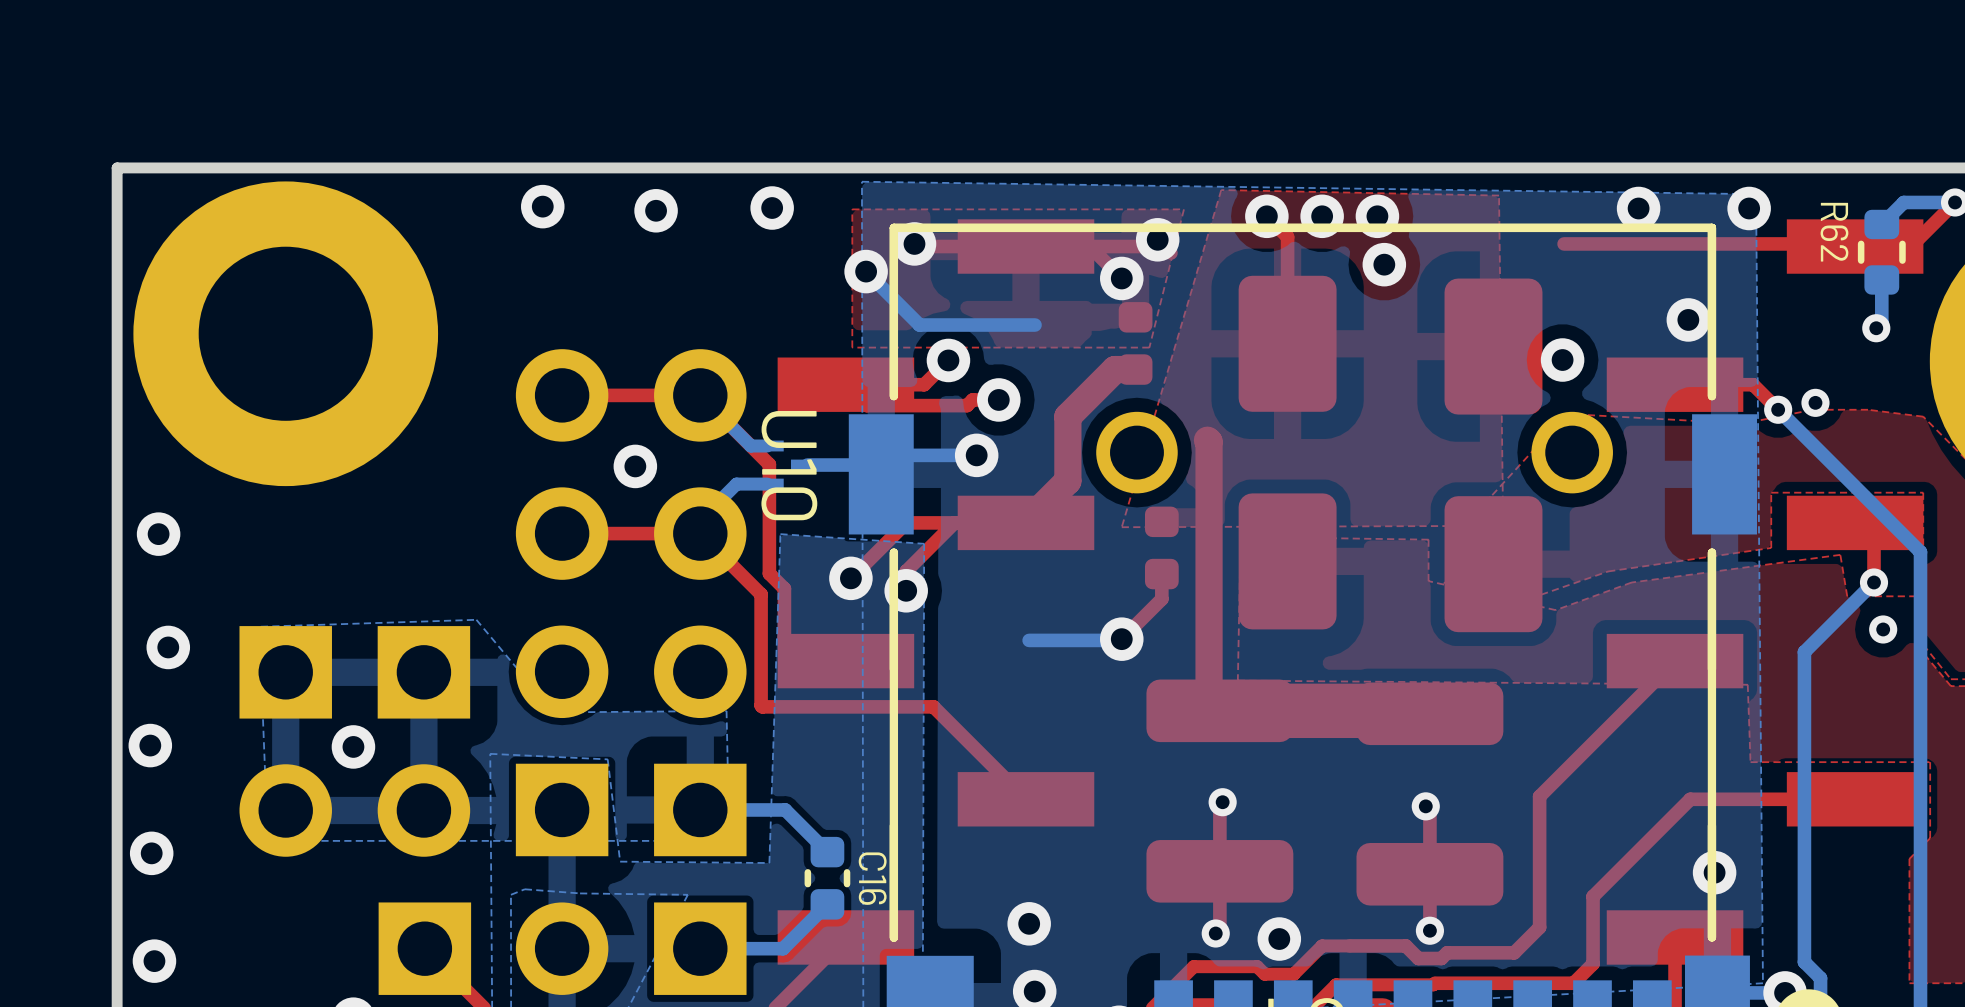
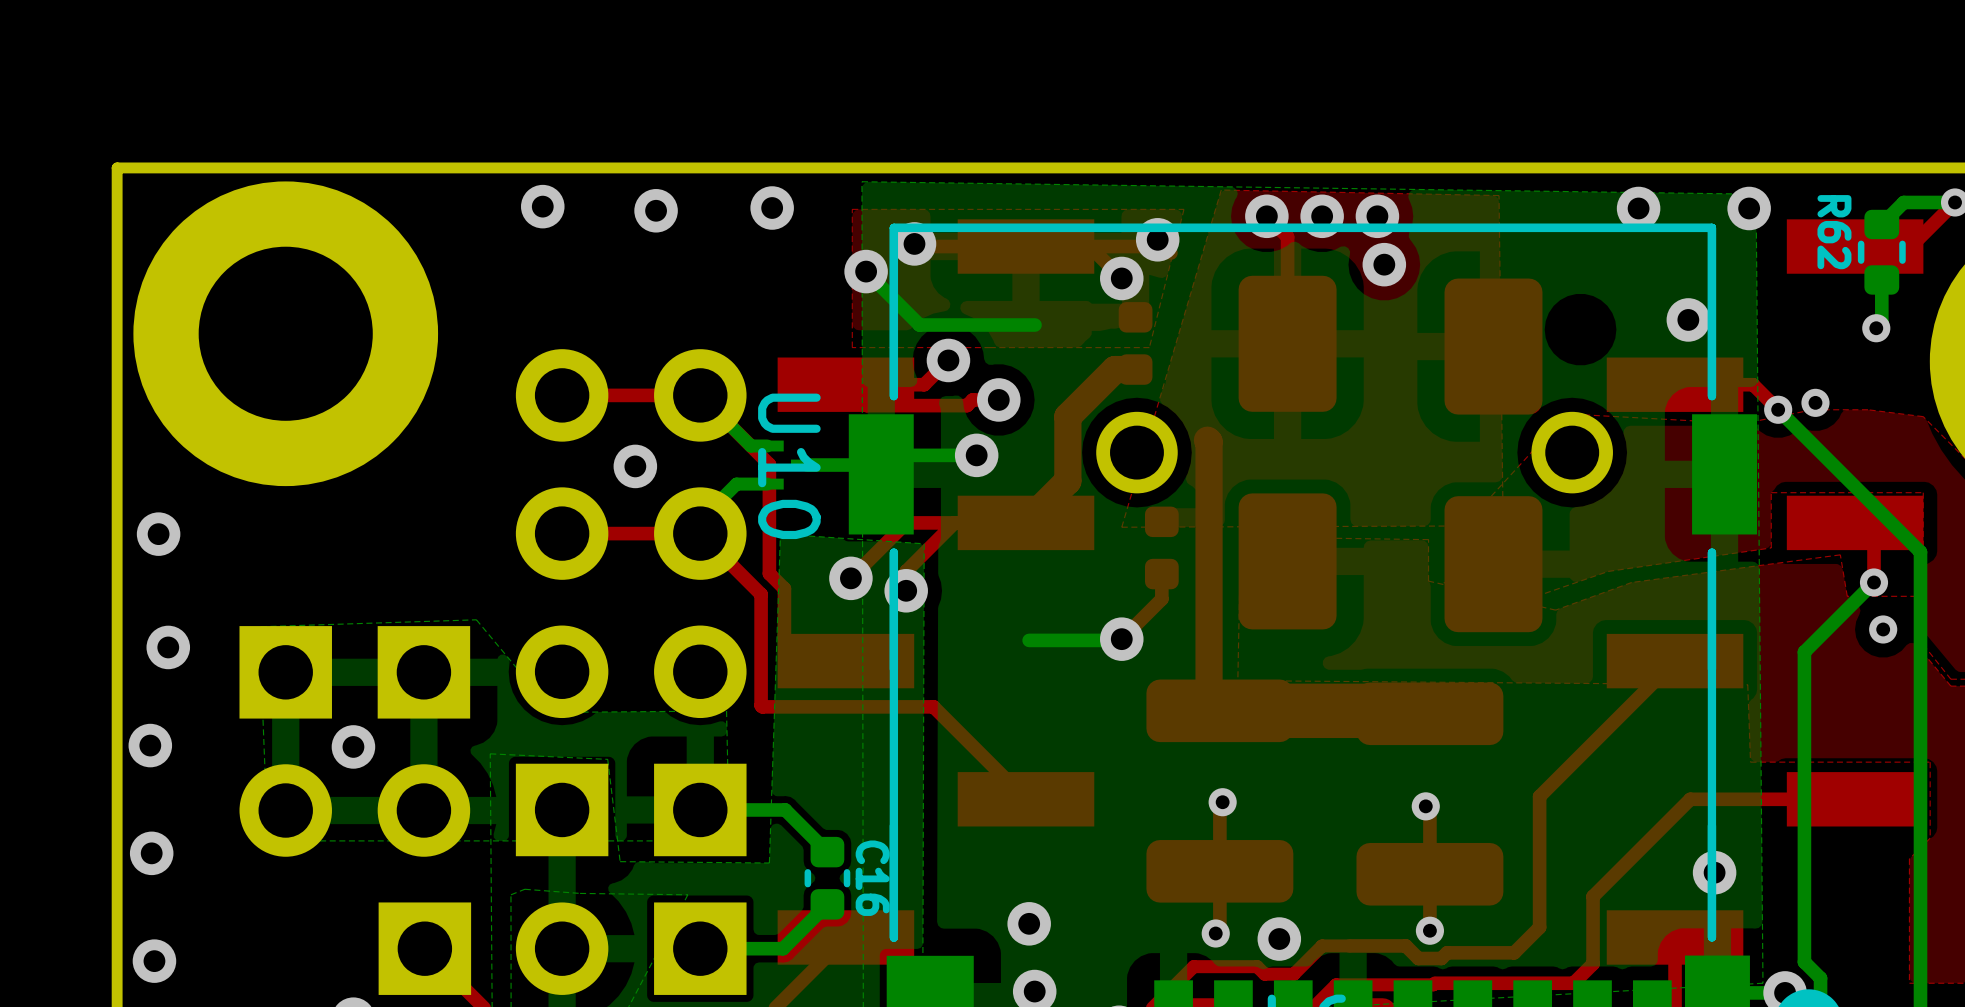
top track: (1852, 243) (1564, 243) -> none
via: (1562, 360) -> none

